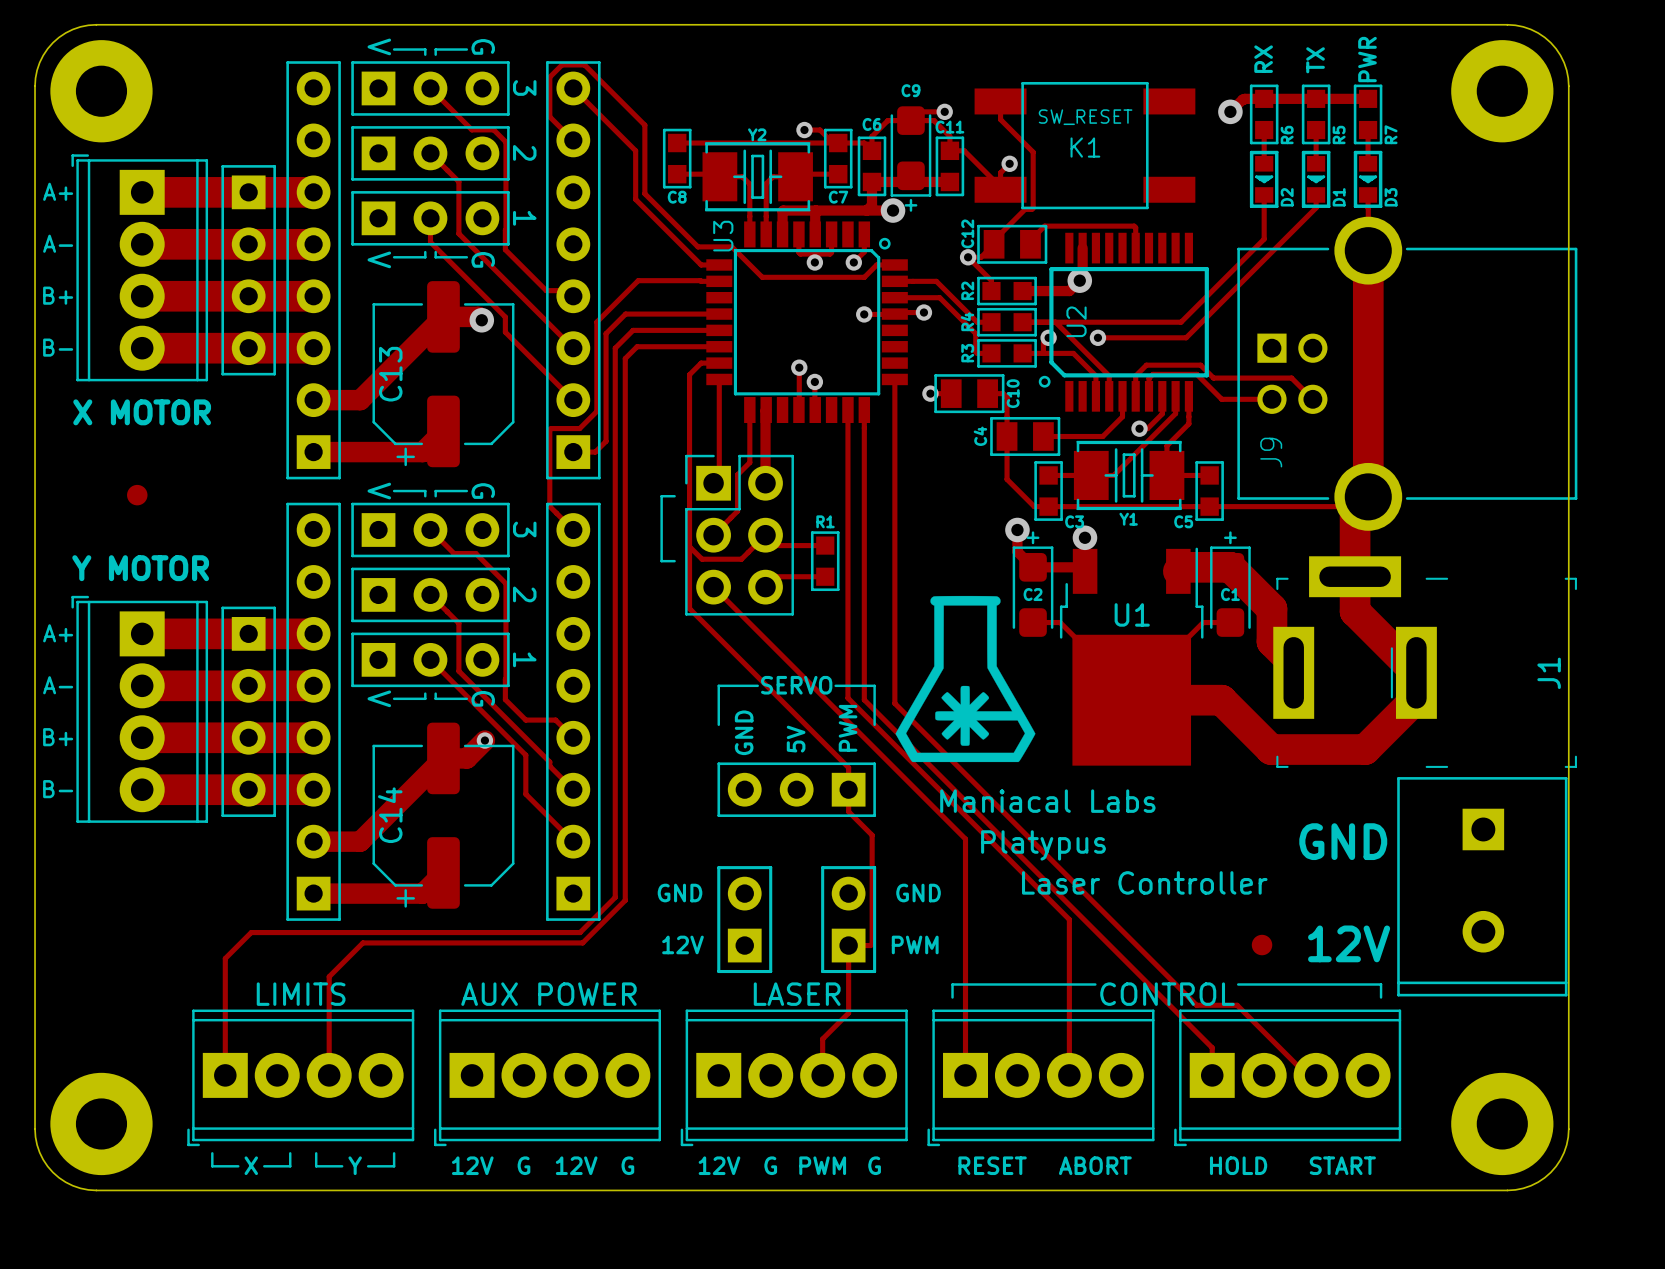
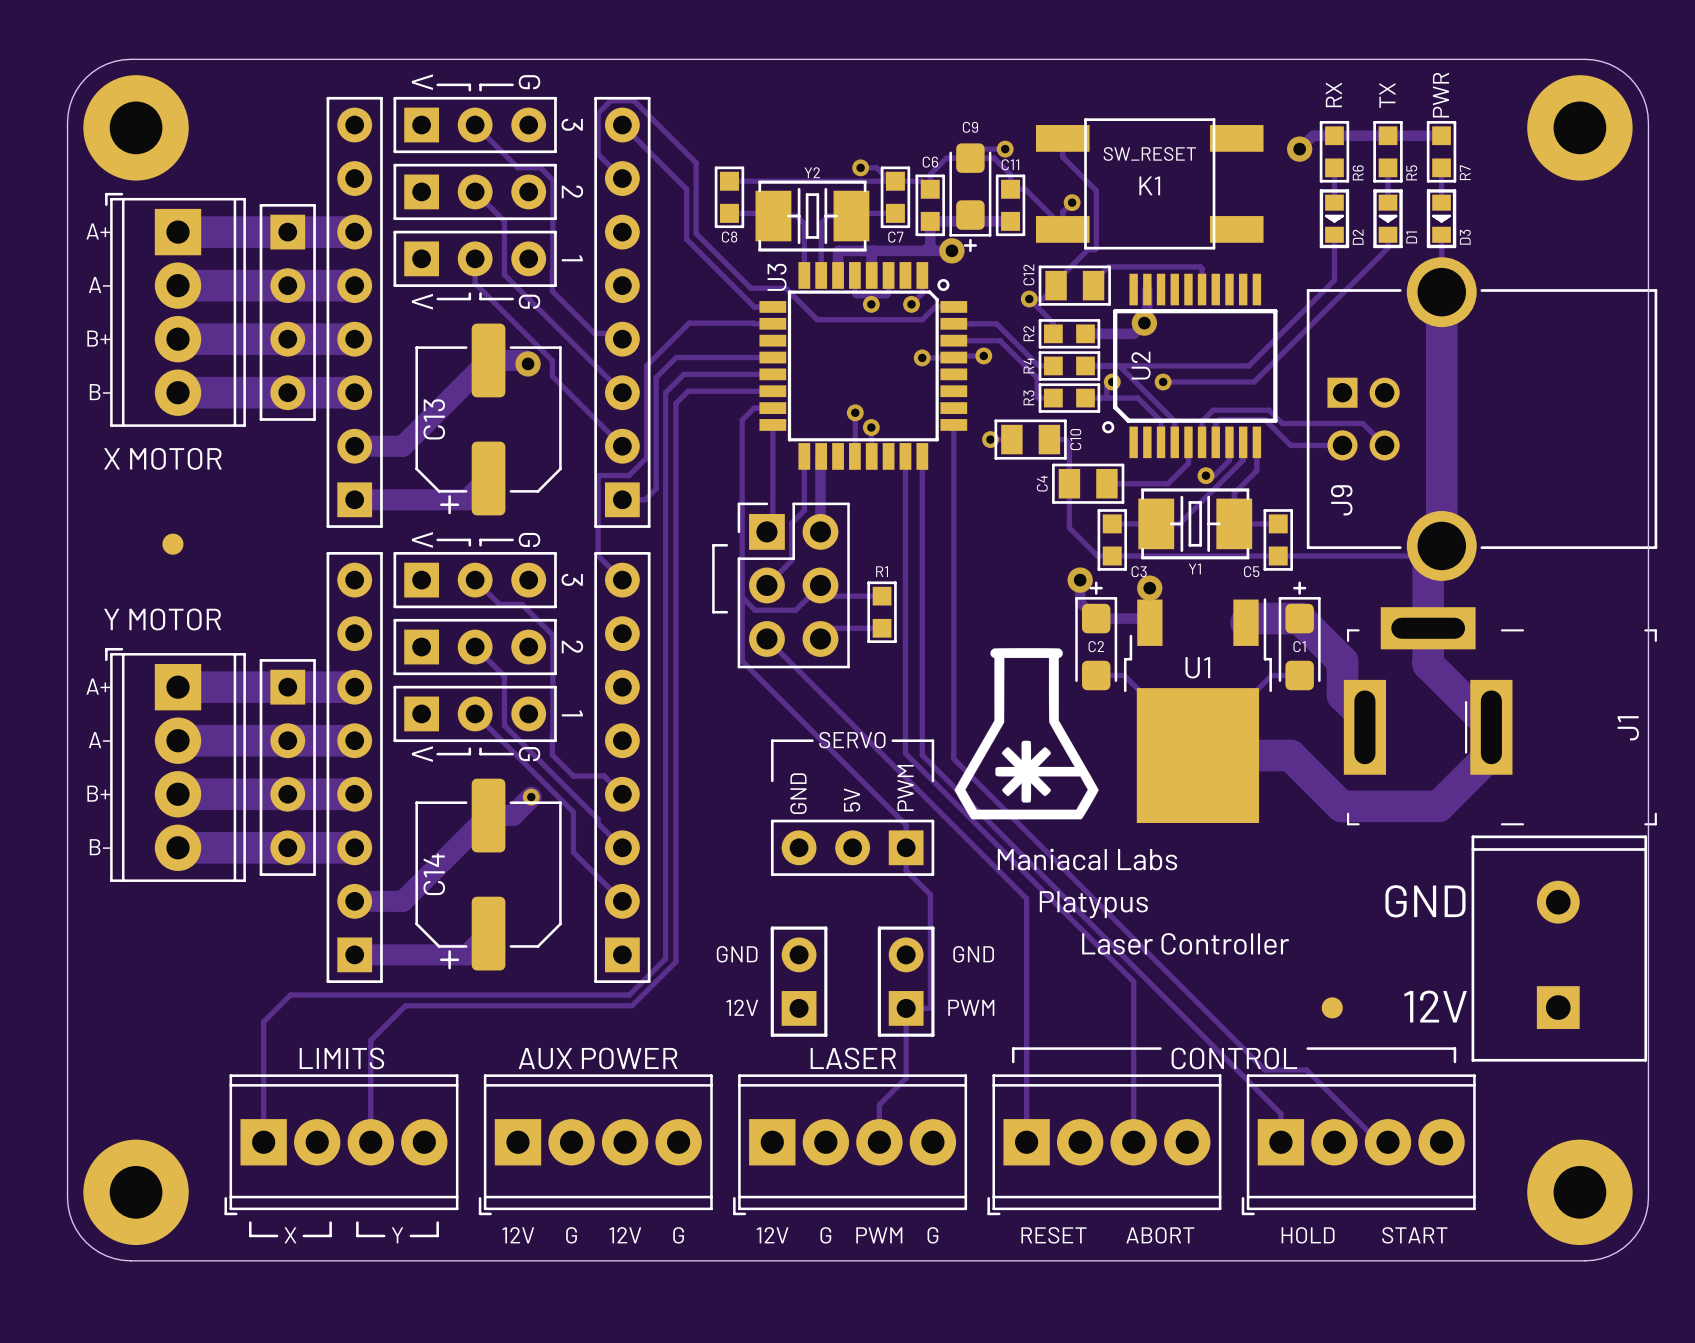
part rotation: 0° (1482, 886) -> 180° (1559, 948)

